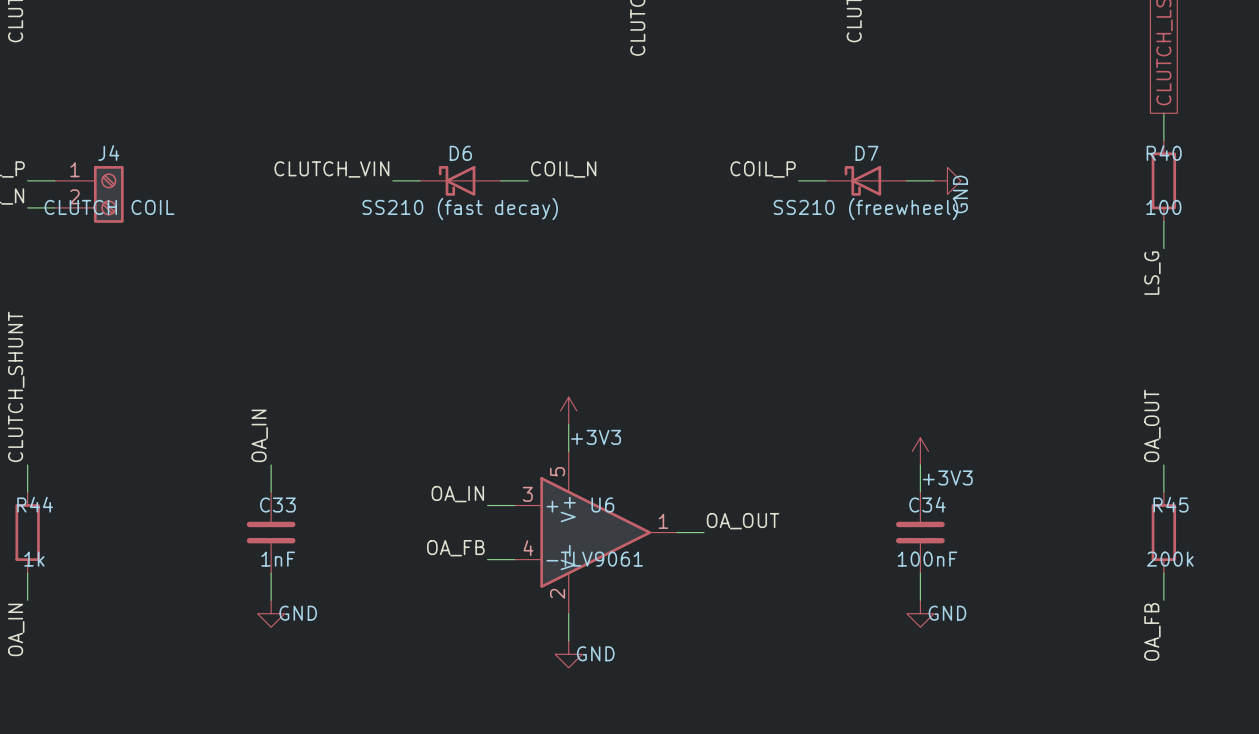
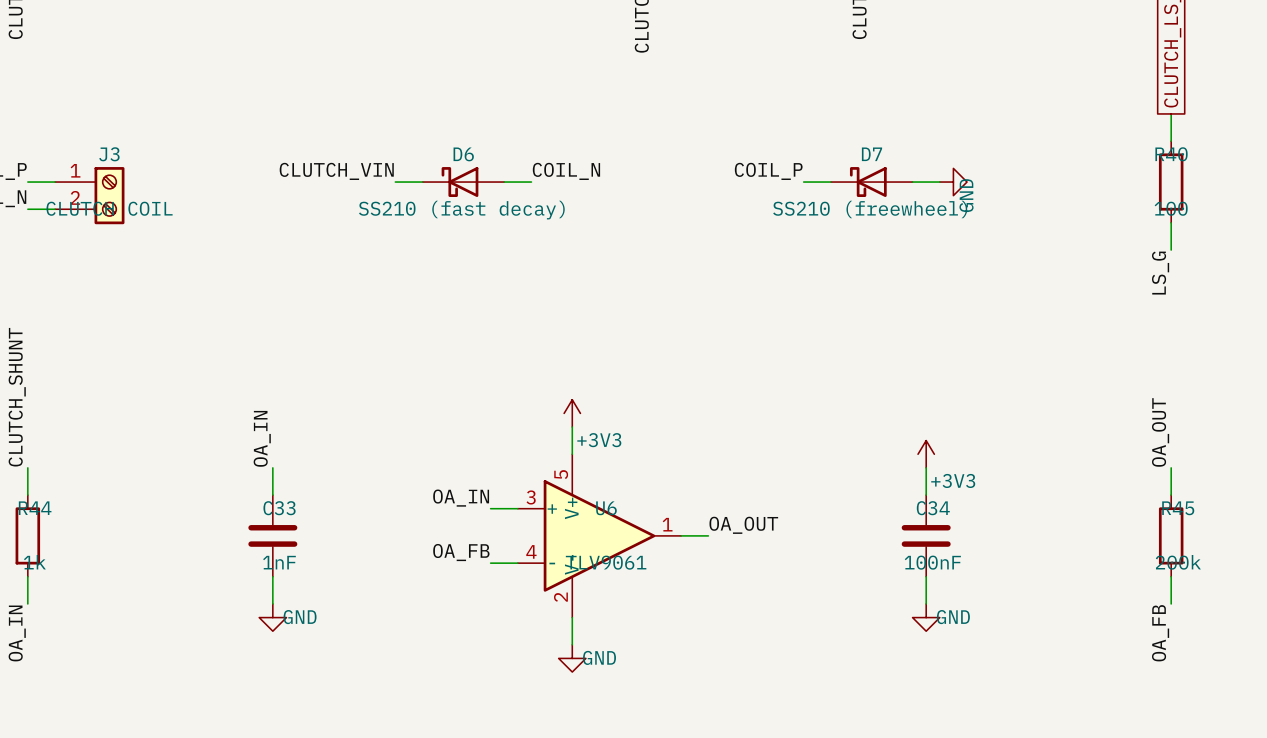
J4 name: J4 (108, 153) -> J3 (109, 154)

